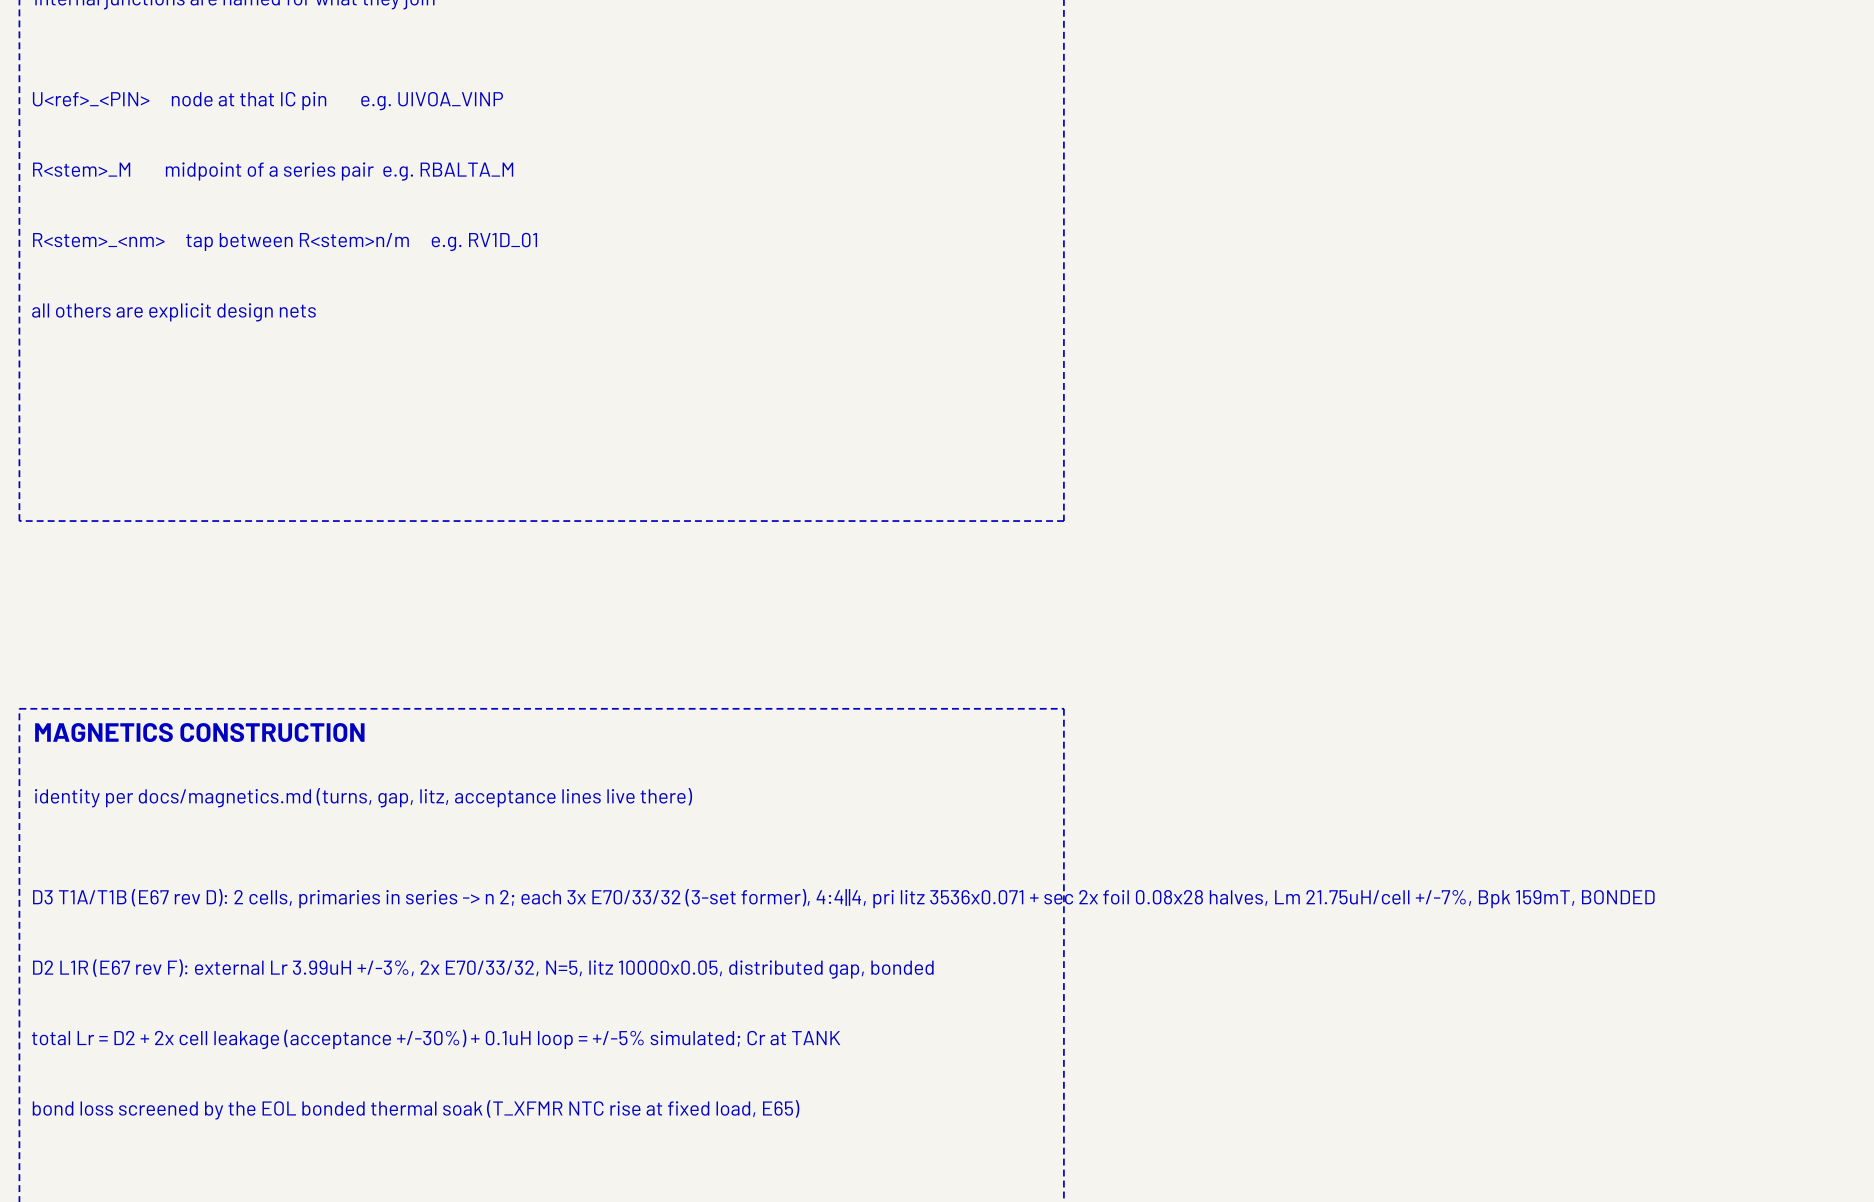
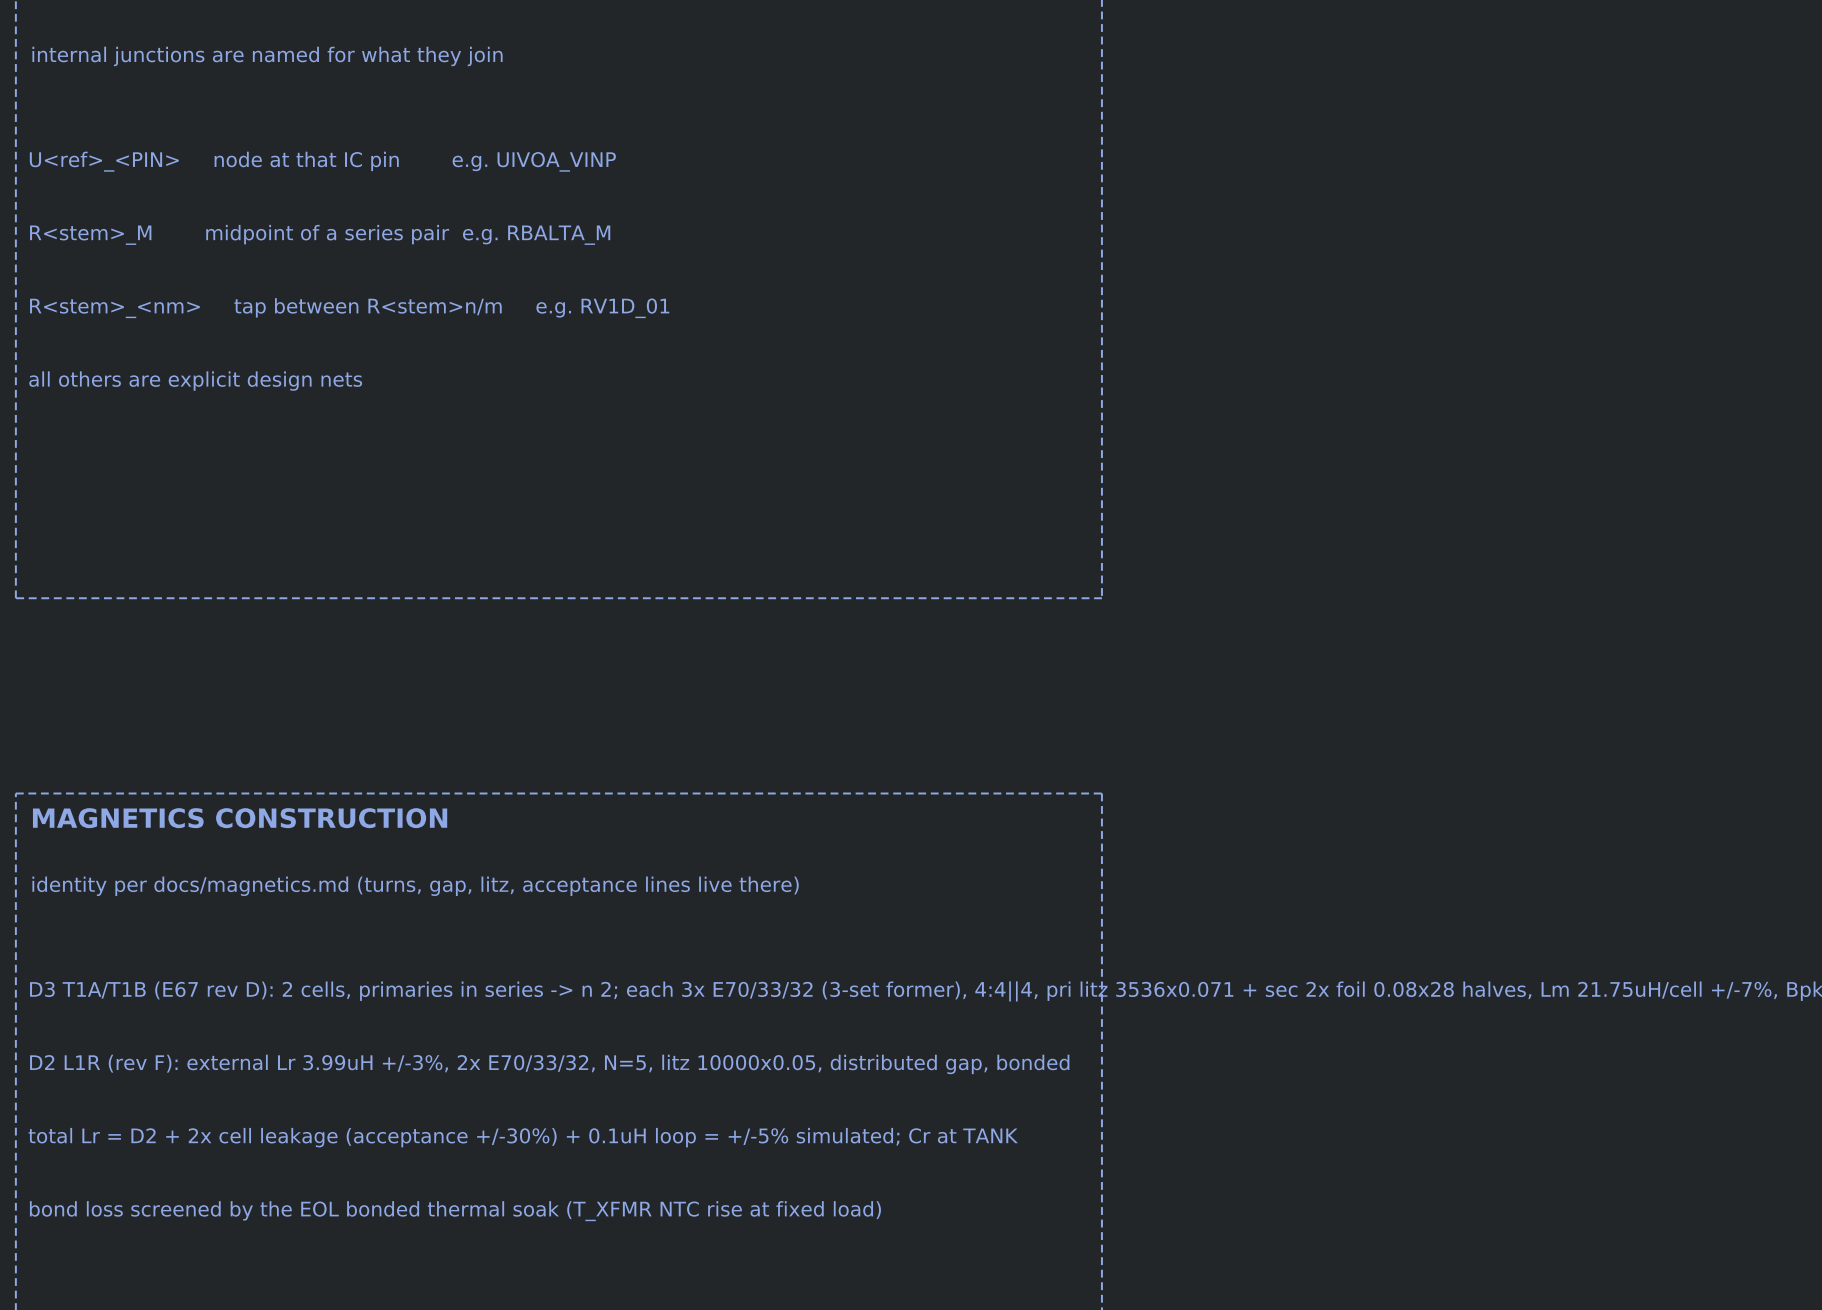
text: D2 L1R (E67 rev F): external Lr 3.99uH +/-3%, 2x E70/33/32, N=5, litz 10000x0.05, distributed gap, bonded (483, 969) -> D2 L1R (rev F): external Lr 3.99uH +/-3%, 2x E70/33/32, N=5, litz 10000x0.05, distributed gap, bonded (549, 1064)
text: bond loss screened by the EOL bonded thermal soak (T_XFMR NTC rise at fixed load, E65) (416, 1109) -> bond loss screened by the EOL bonded thermal soak (T_XFMR NTC rise at fixed load) (455, 1211)

